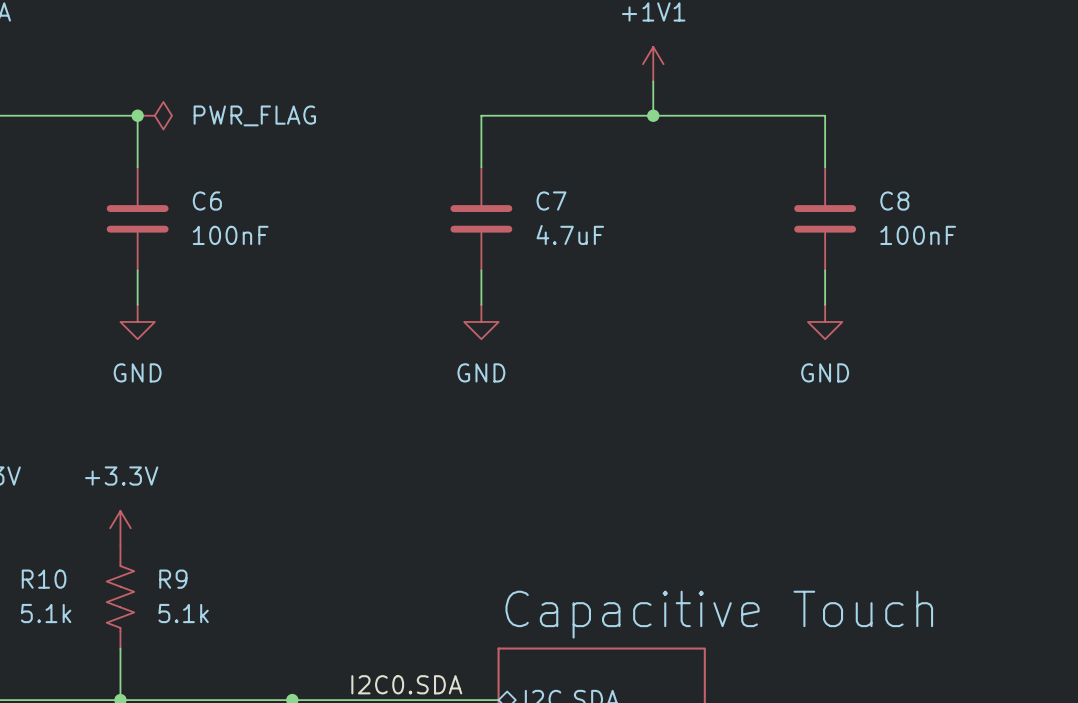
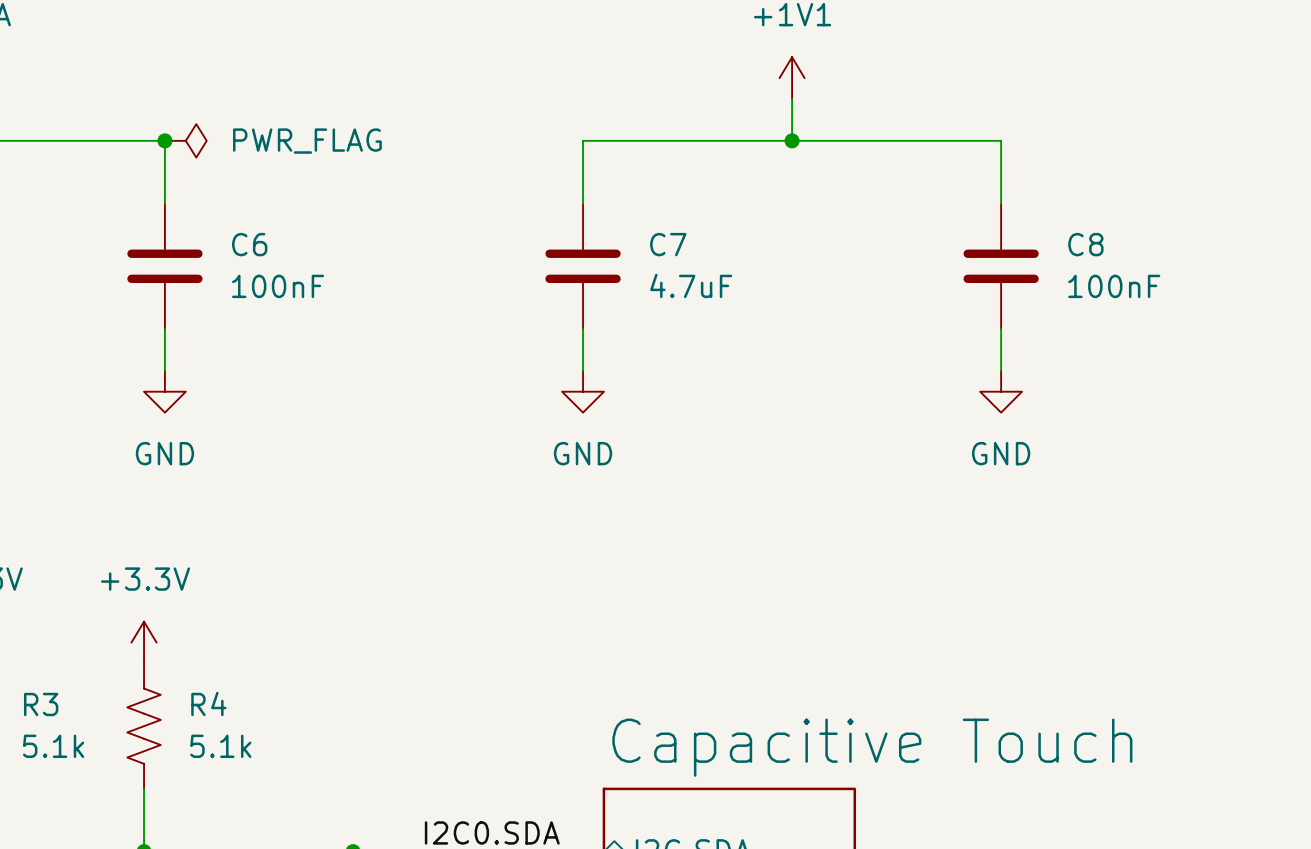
R10 name: R10 (44, 579) -> R3 (41, 704)
R9 name: R9 (173, 579) -> R4 (208, 704)

